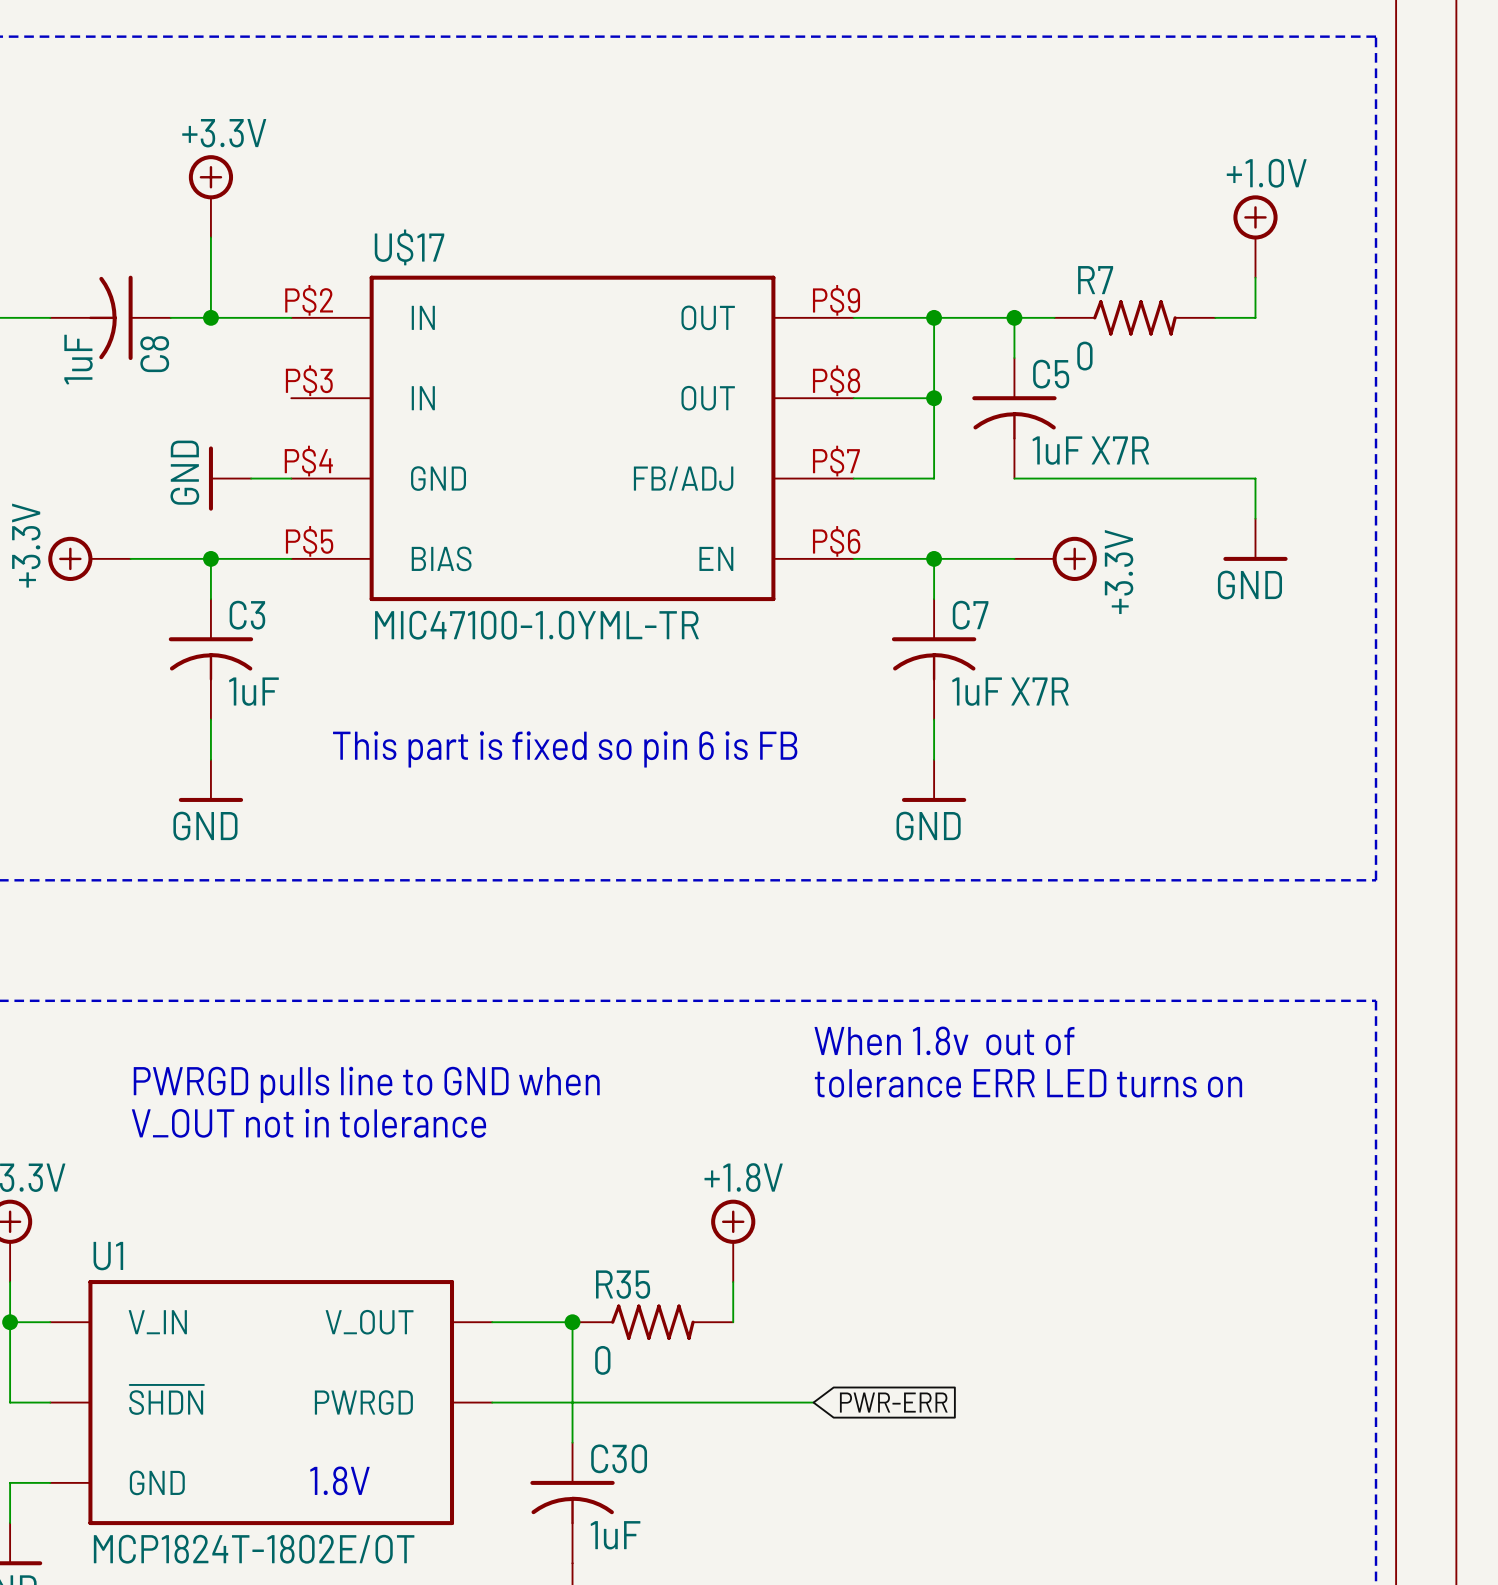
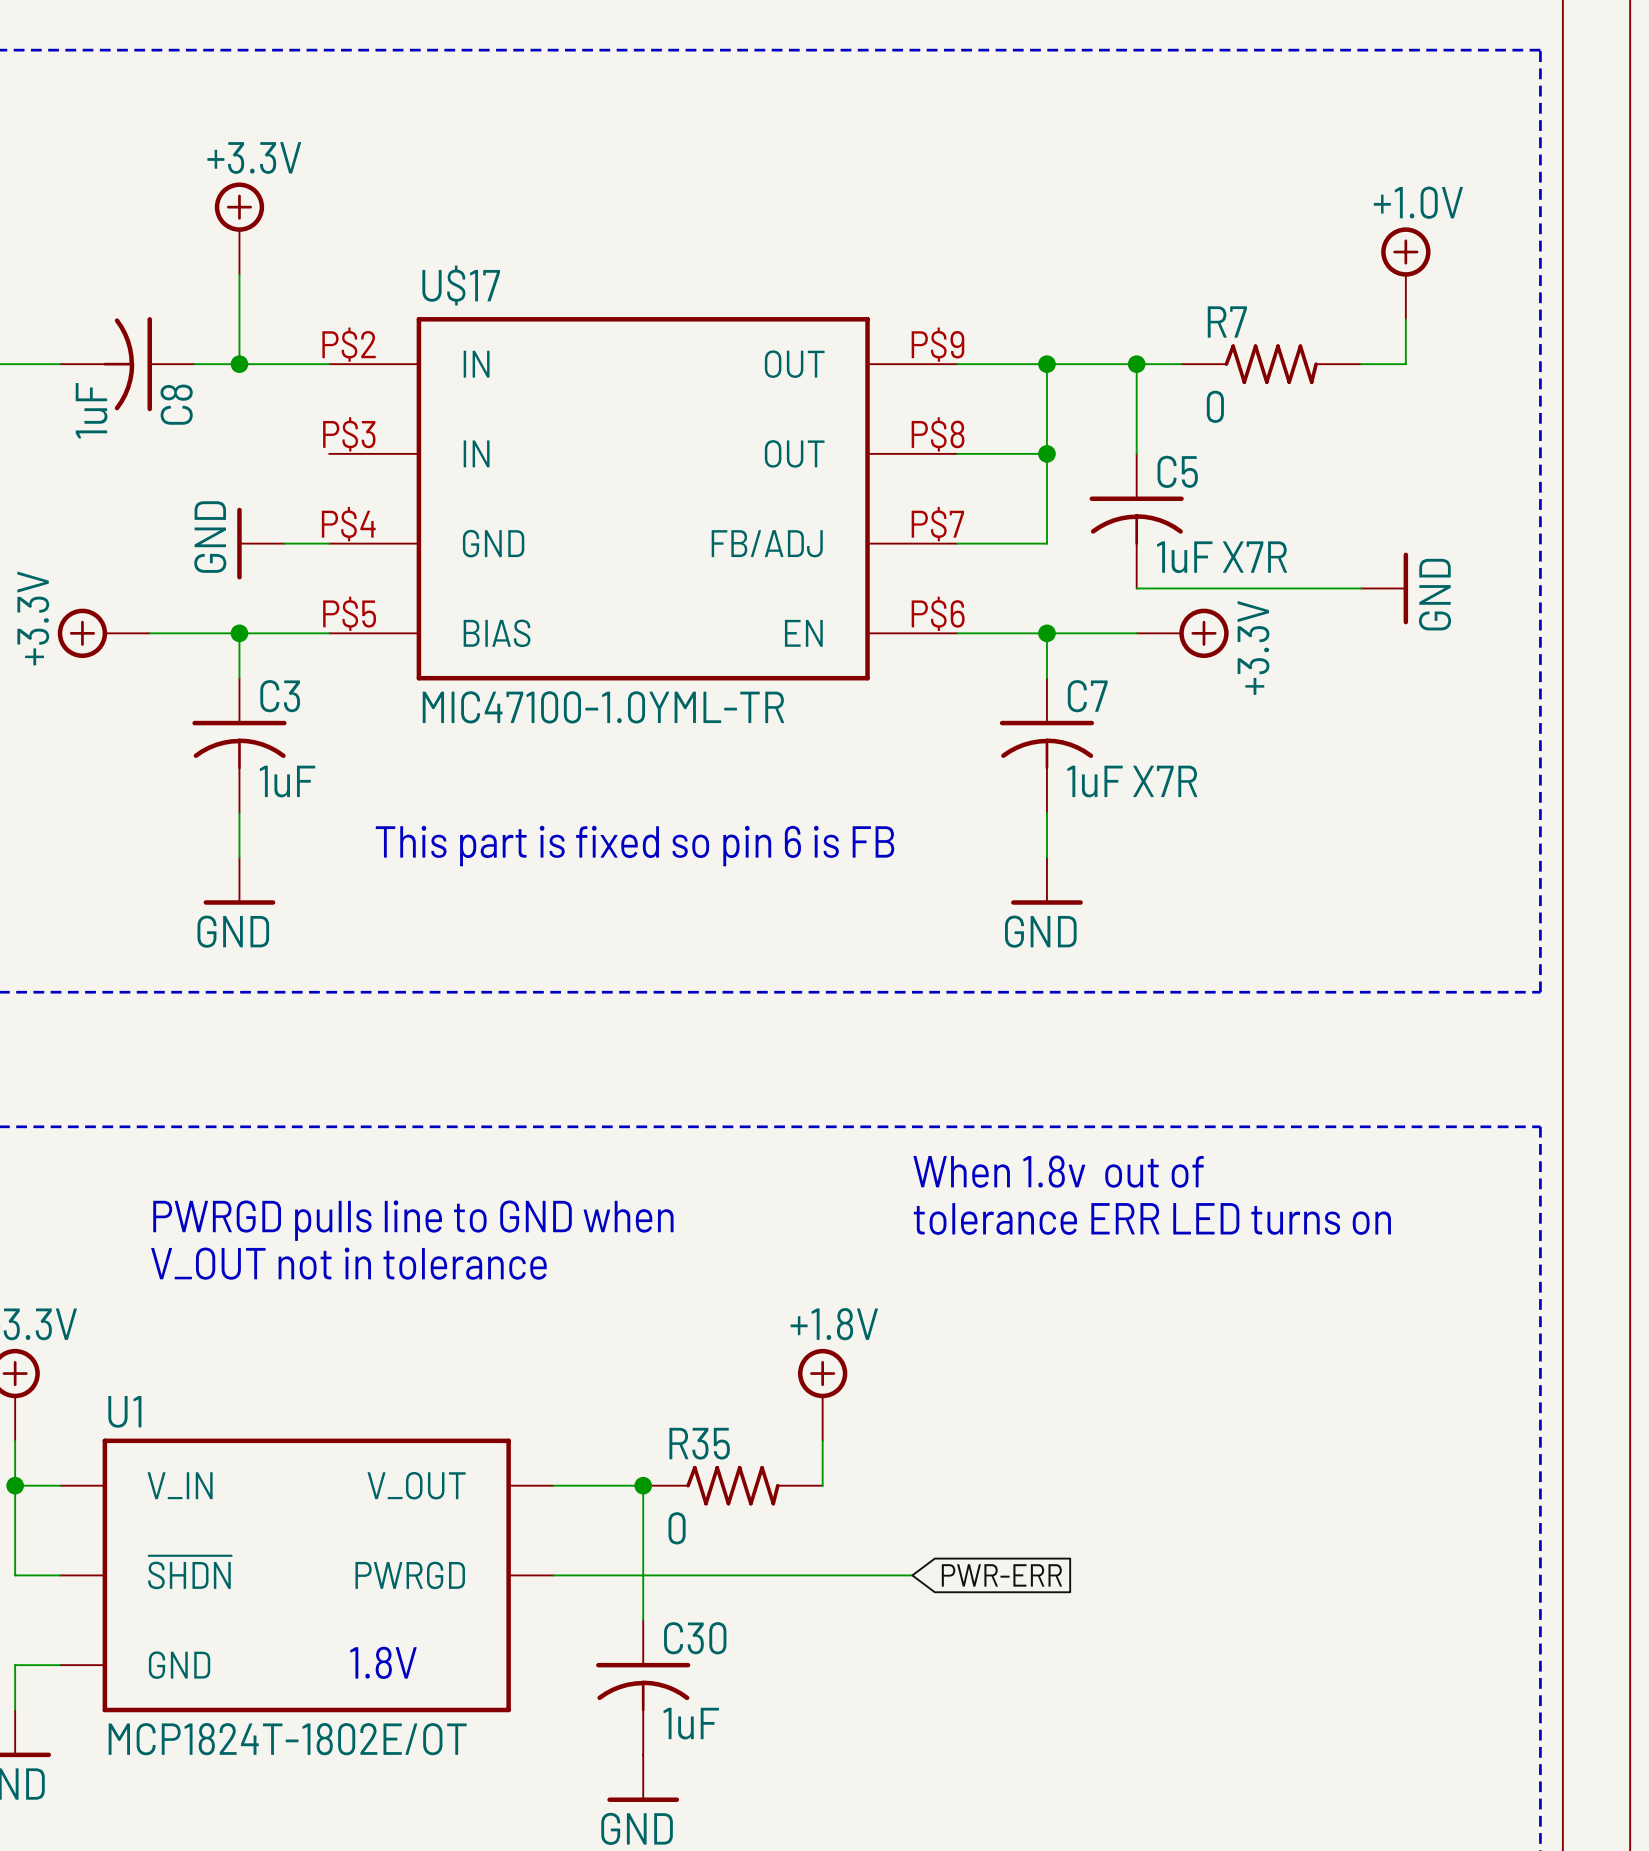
C5 position: (1014, 418) -> (1136, 521)
wire: (1014, 478) (1255, 478) (1255, 518) -> none
wire: none -> (1136, 588) (1360, 588)
power symbol rotation: 0° (1255, 558) -> 90° counterclockwise (1405, 588)

